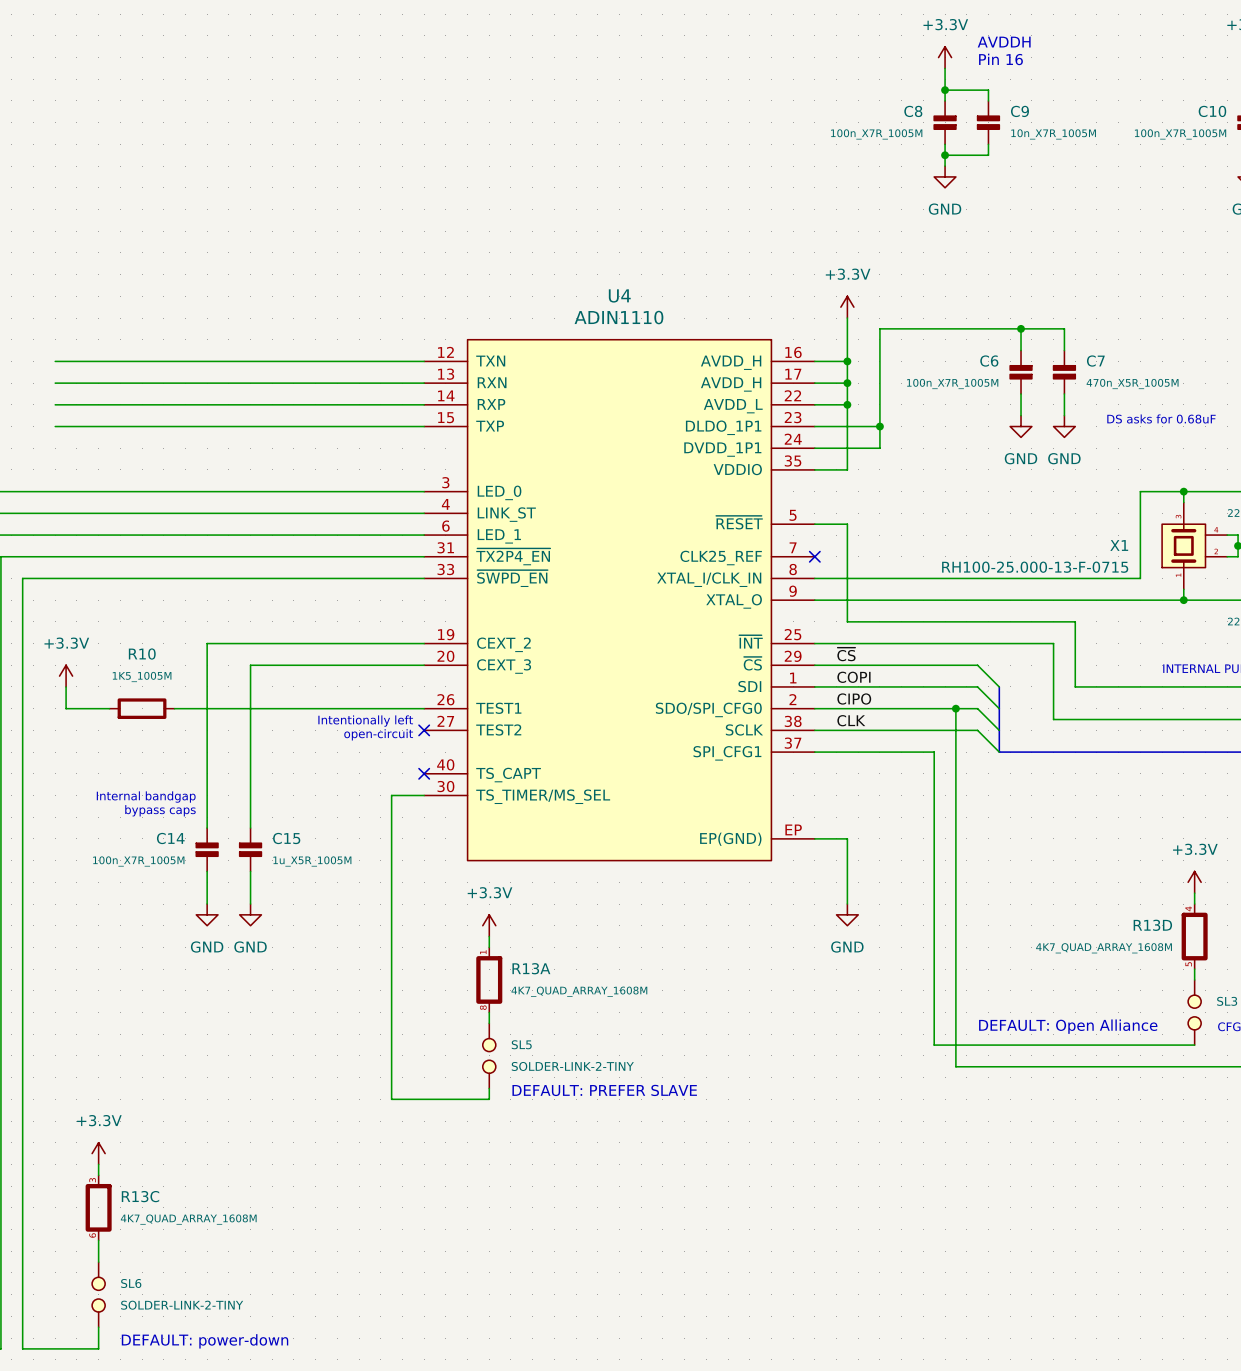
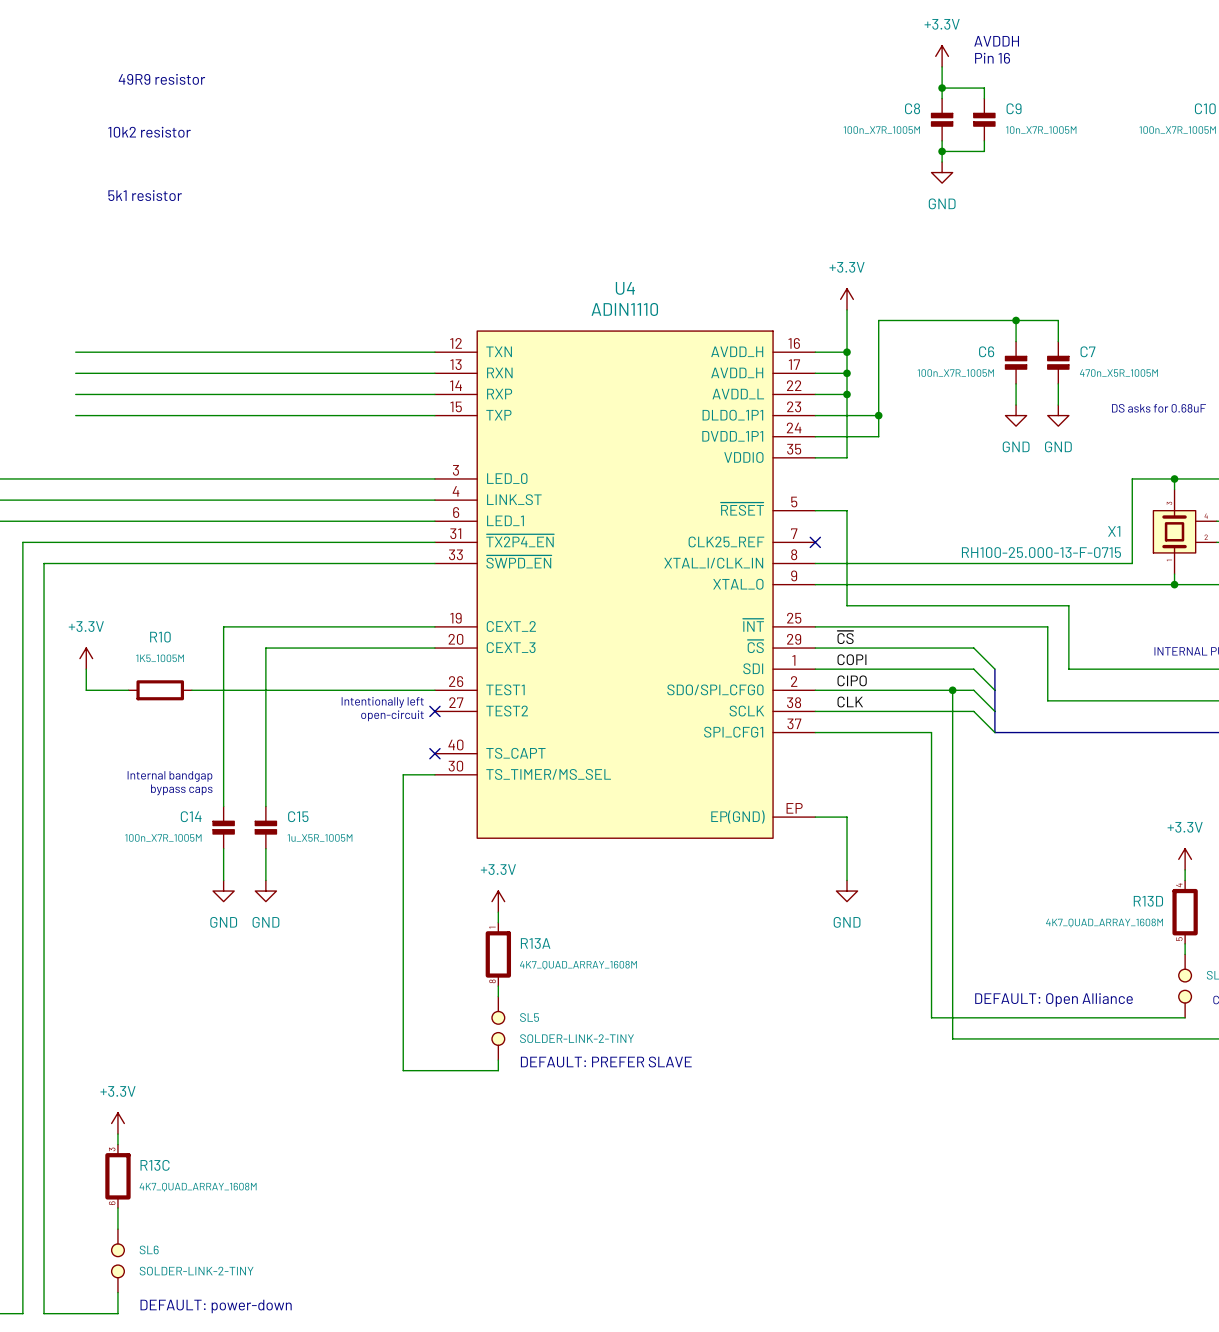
text: none -> 49R9 resistor (161, 79)
text: none -> 10k2 resistor (149, 132)
text: none -> 5k1 resistor (145, 195)

